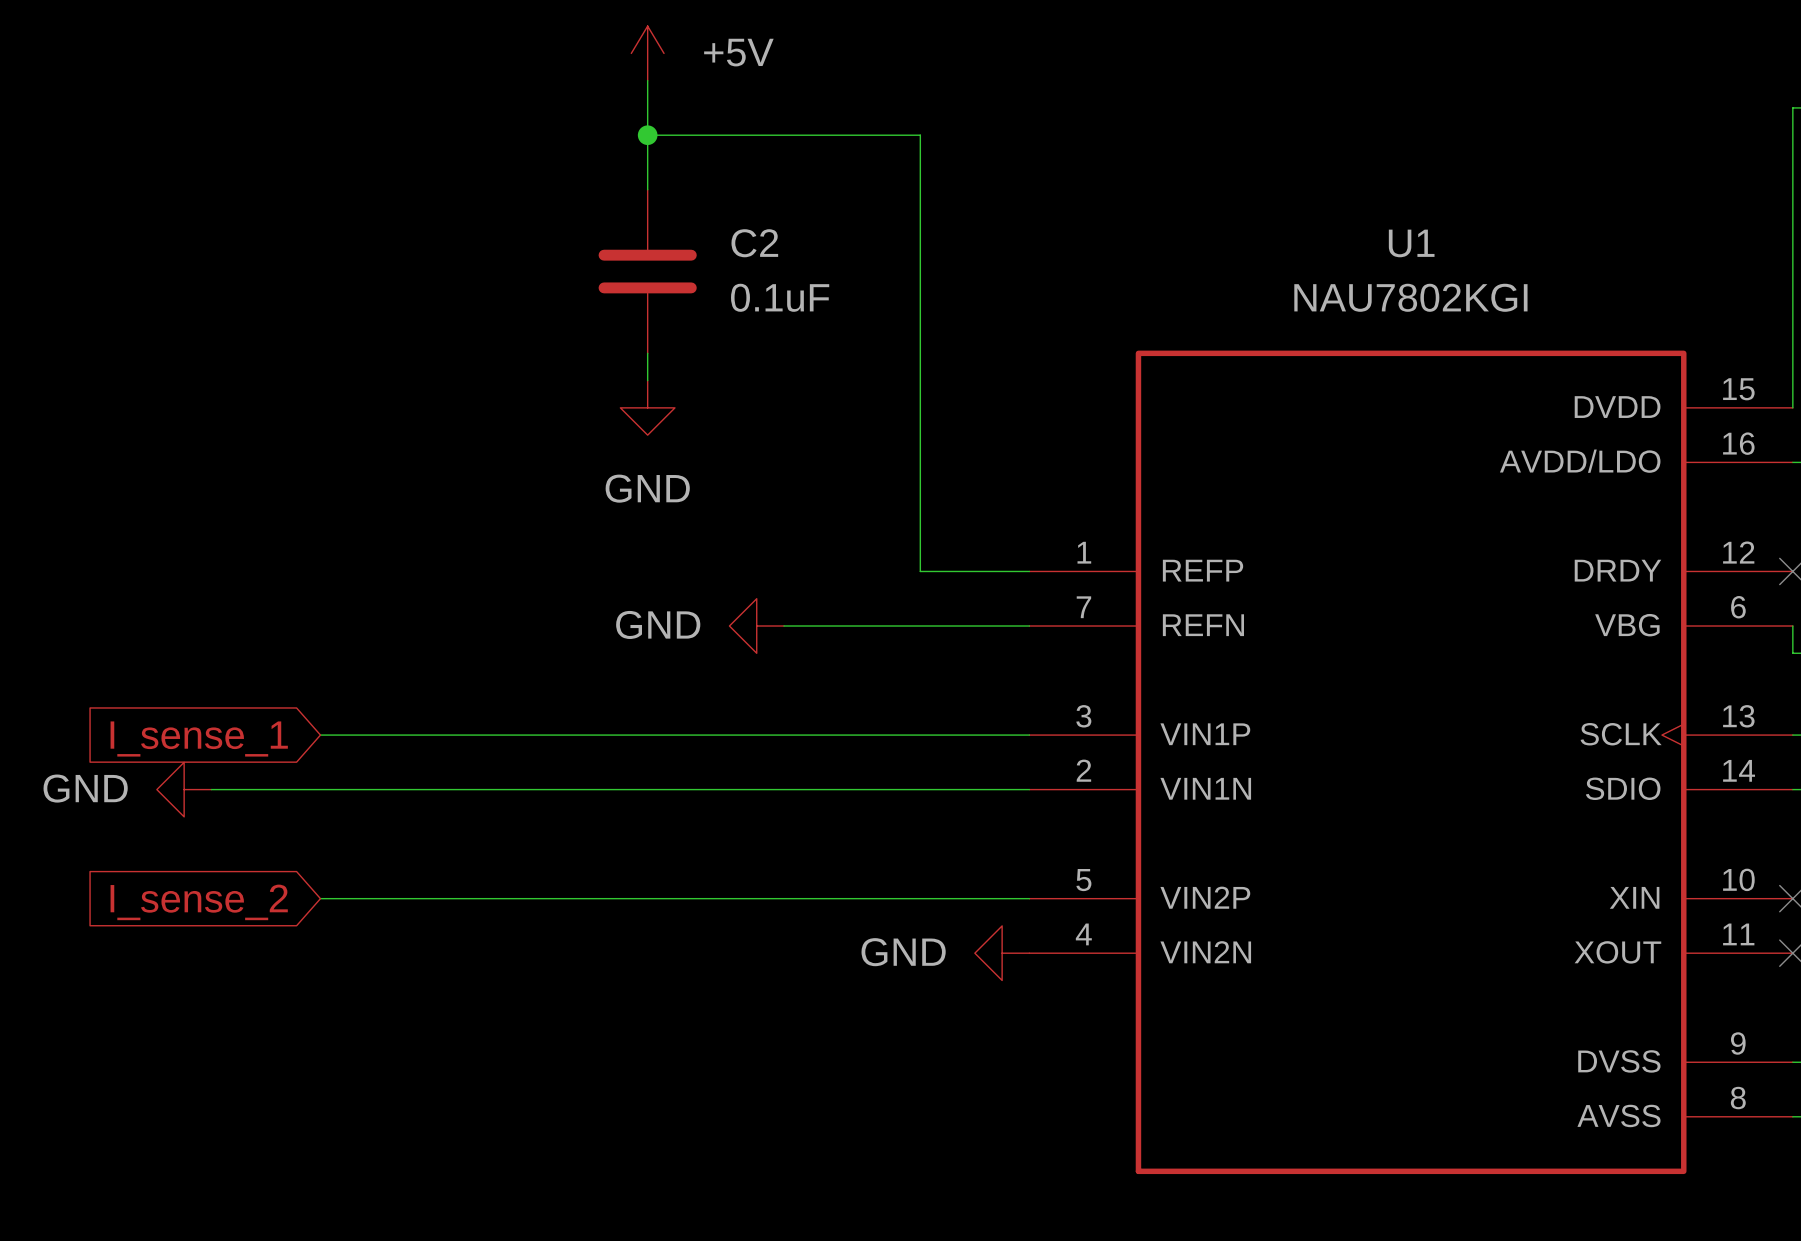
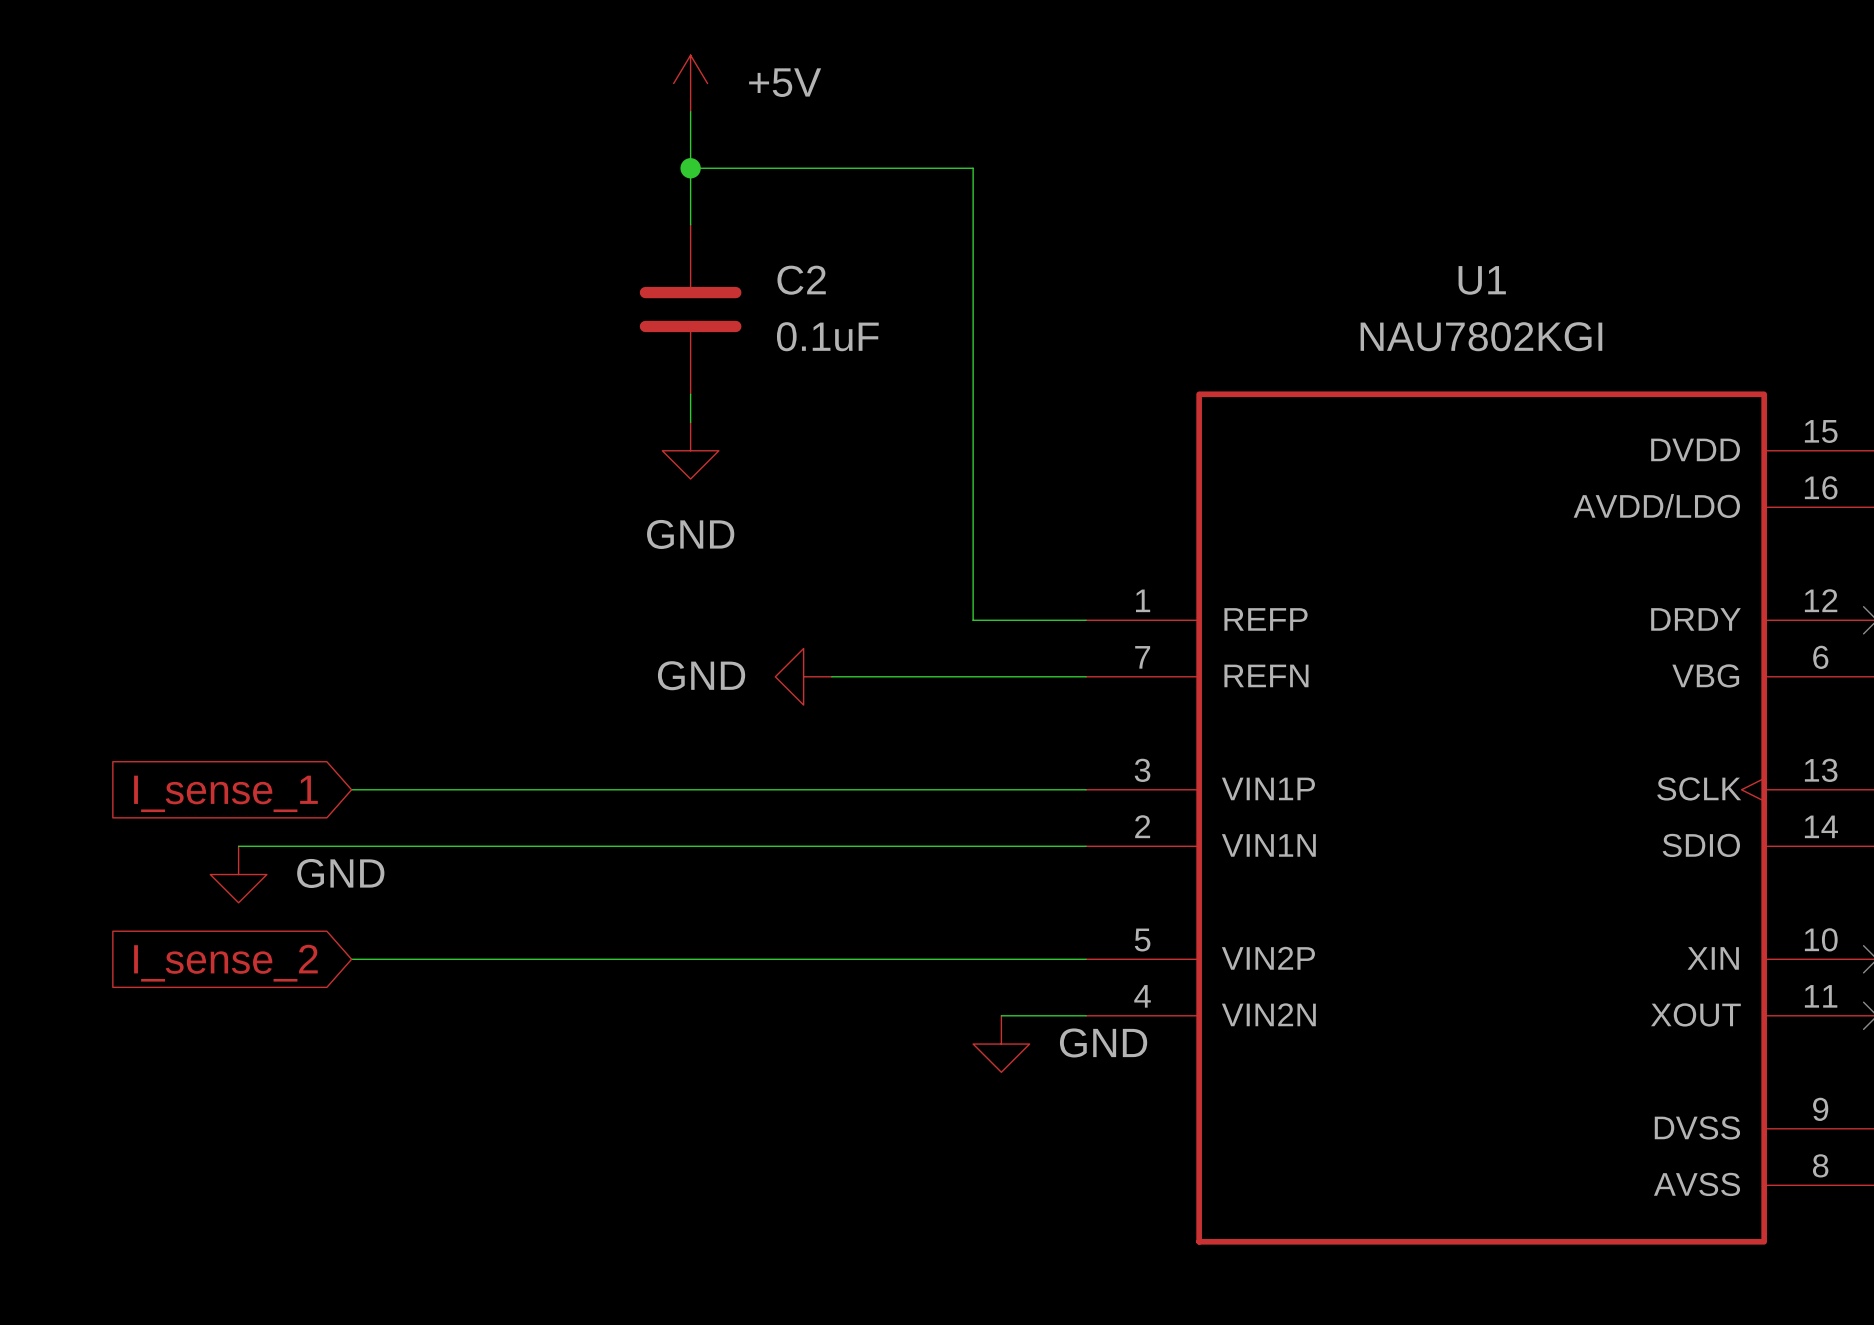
power symbol text position: GND (85, 788) -> GND (340, 873)
power symbol rotation: 0° (184, 789) -> 90° counterclockwise (238, 874)
power symbol position: GND (184, 789) -> GND (238, 874)
power symbol text position: GND (903, 952) -> GND (1103, 1042)
wire: none -> (1001, 1015) (1086, 1015)
power symbol rotation: 0° (1002, 953) -> 90° counterclockwise (1001, 1044)
power symbol position: GND (1002, 953) -> GND (1001, 1044)

